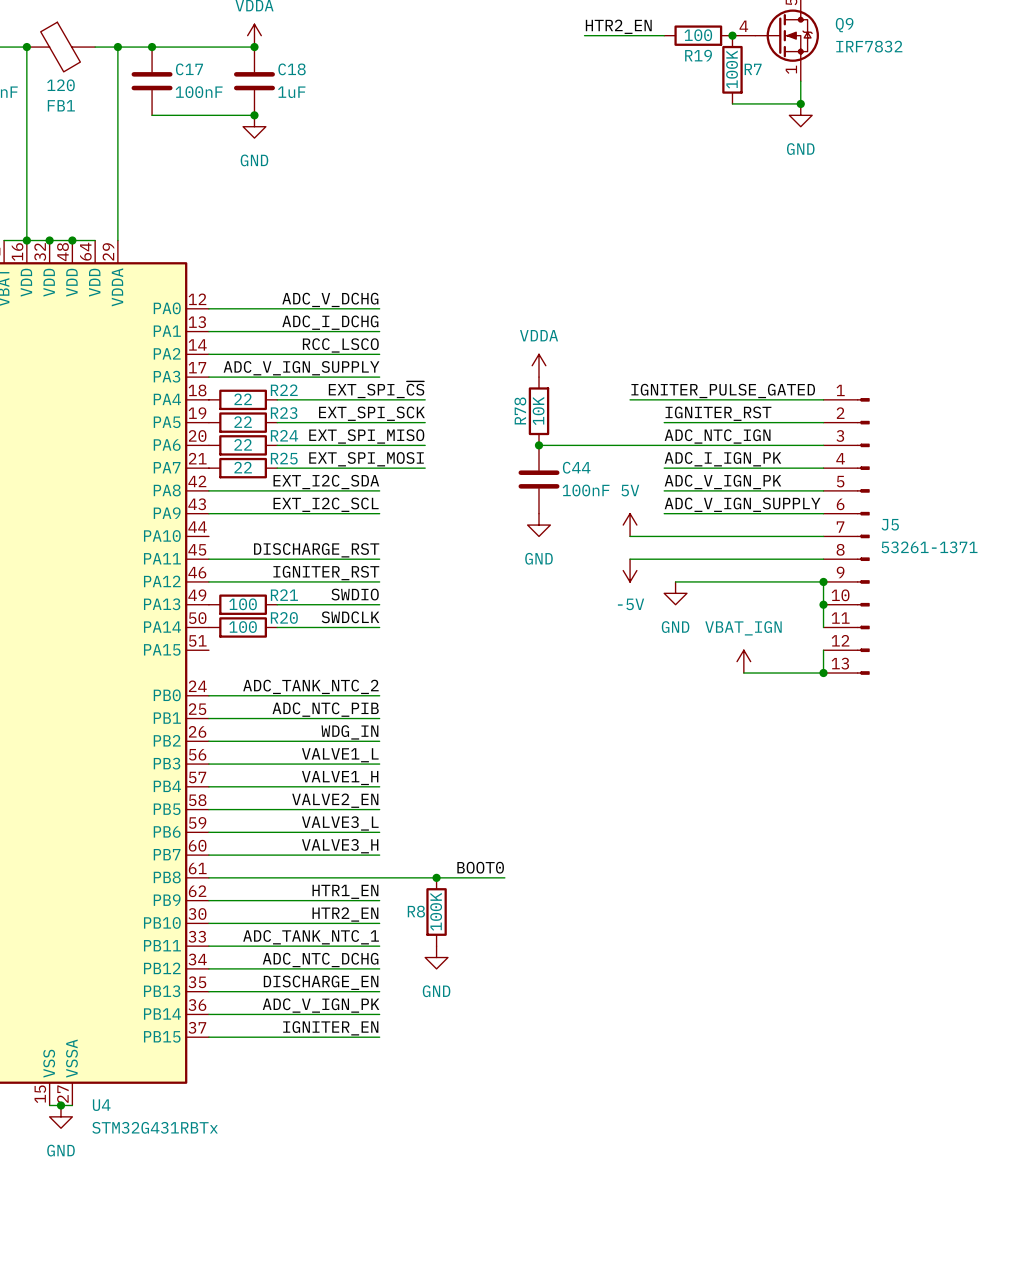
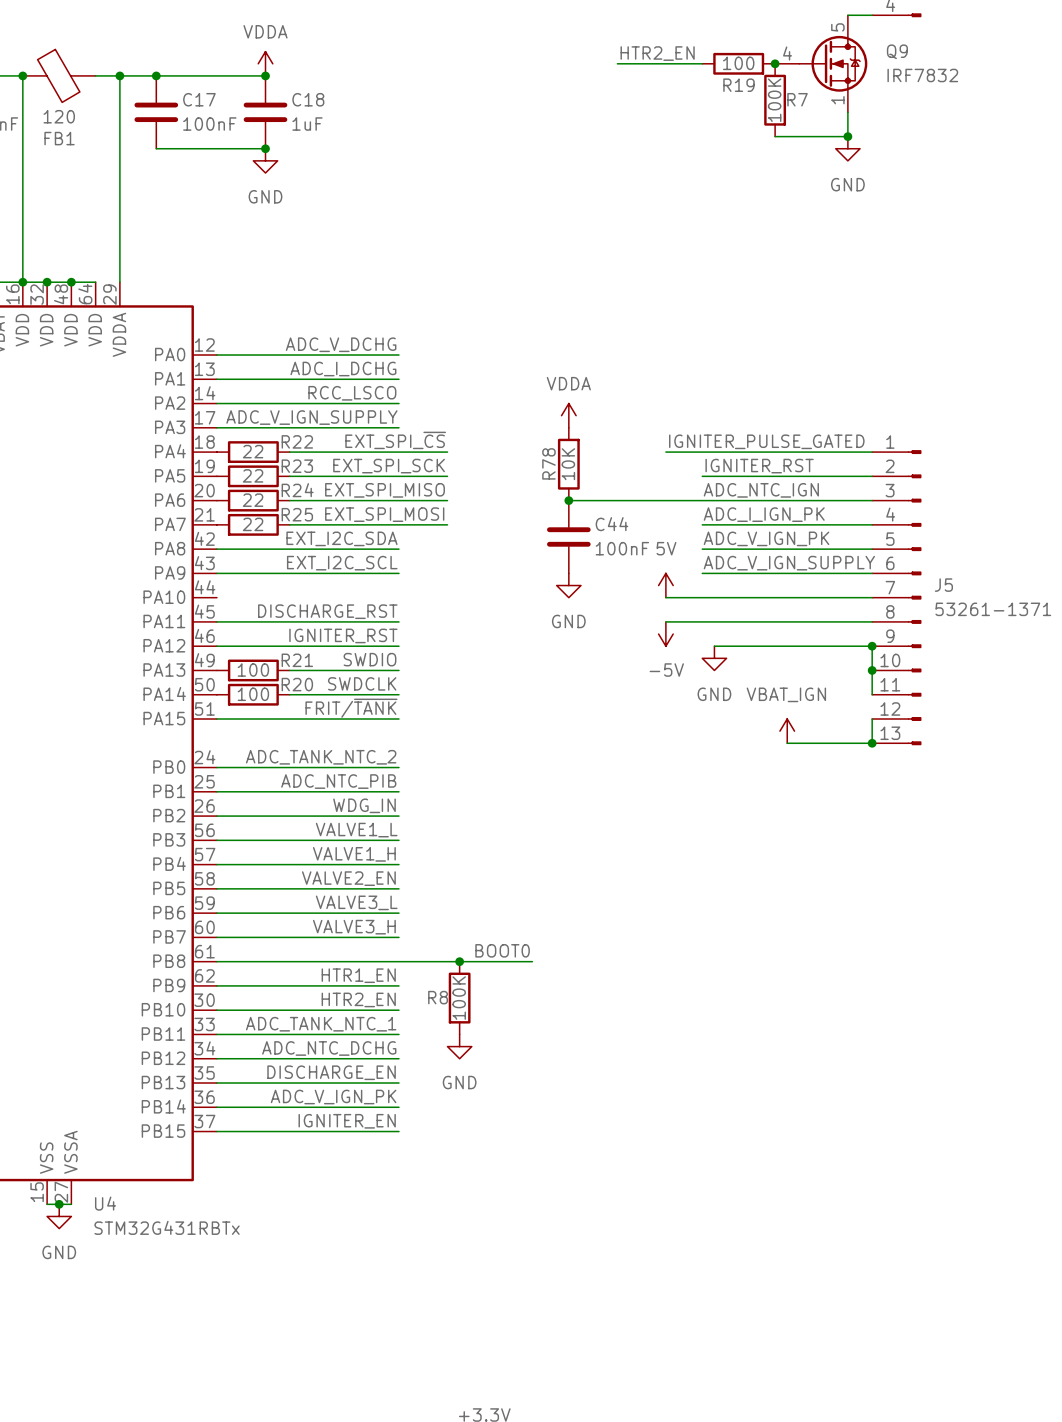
label: none -> FRIT/~{TANK} (351, 708)
wire: none -> (216, 719) (398, 719)

